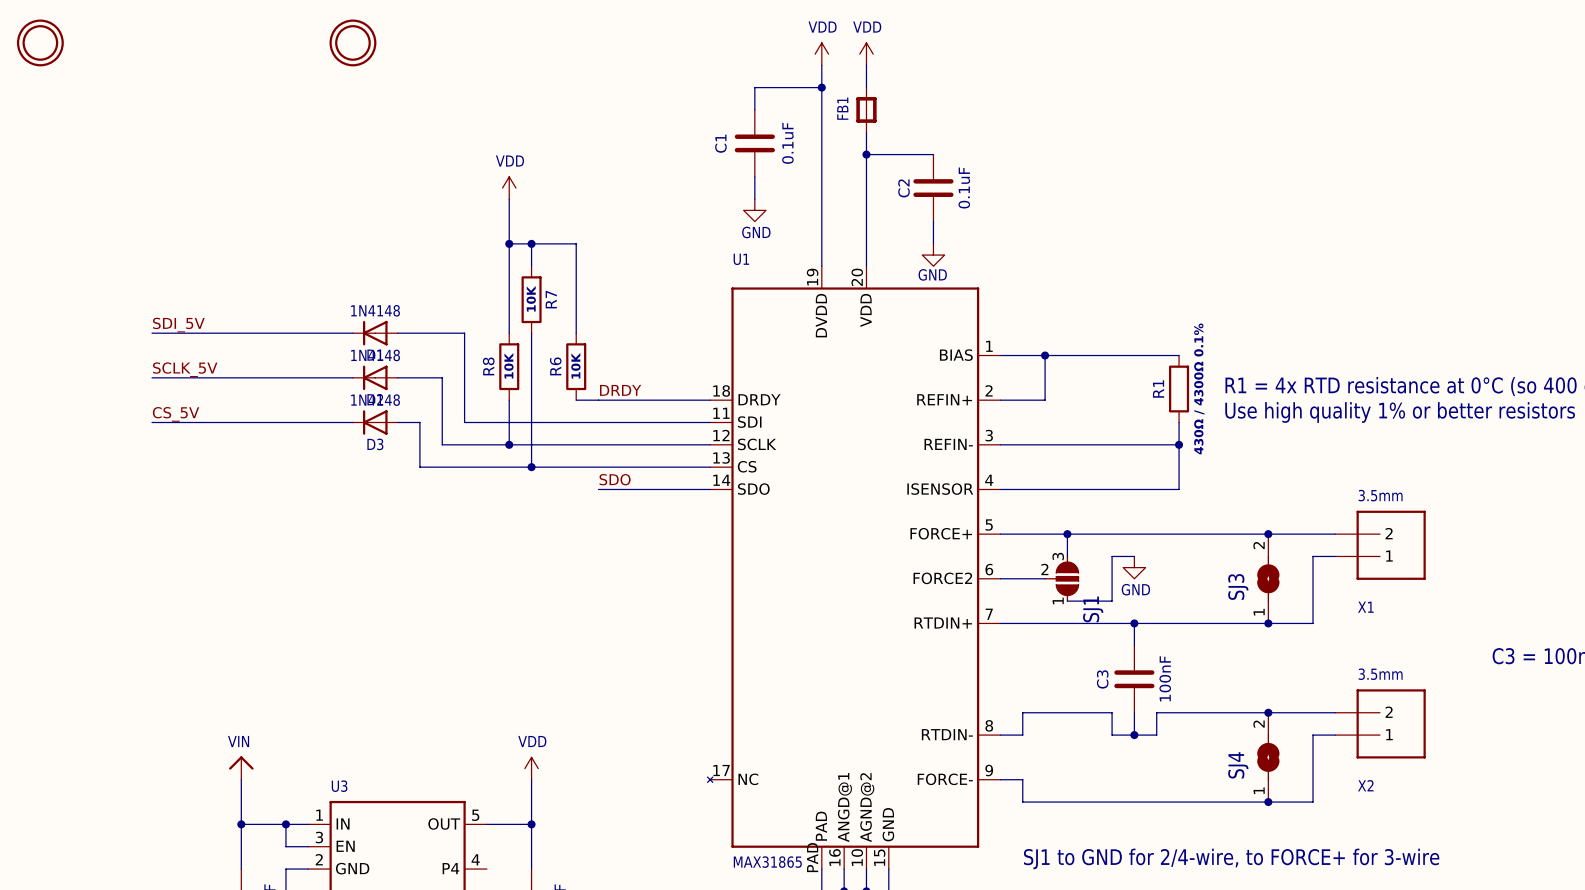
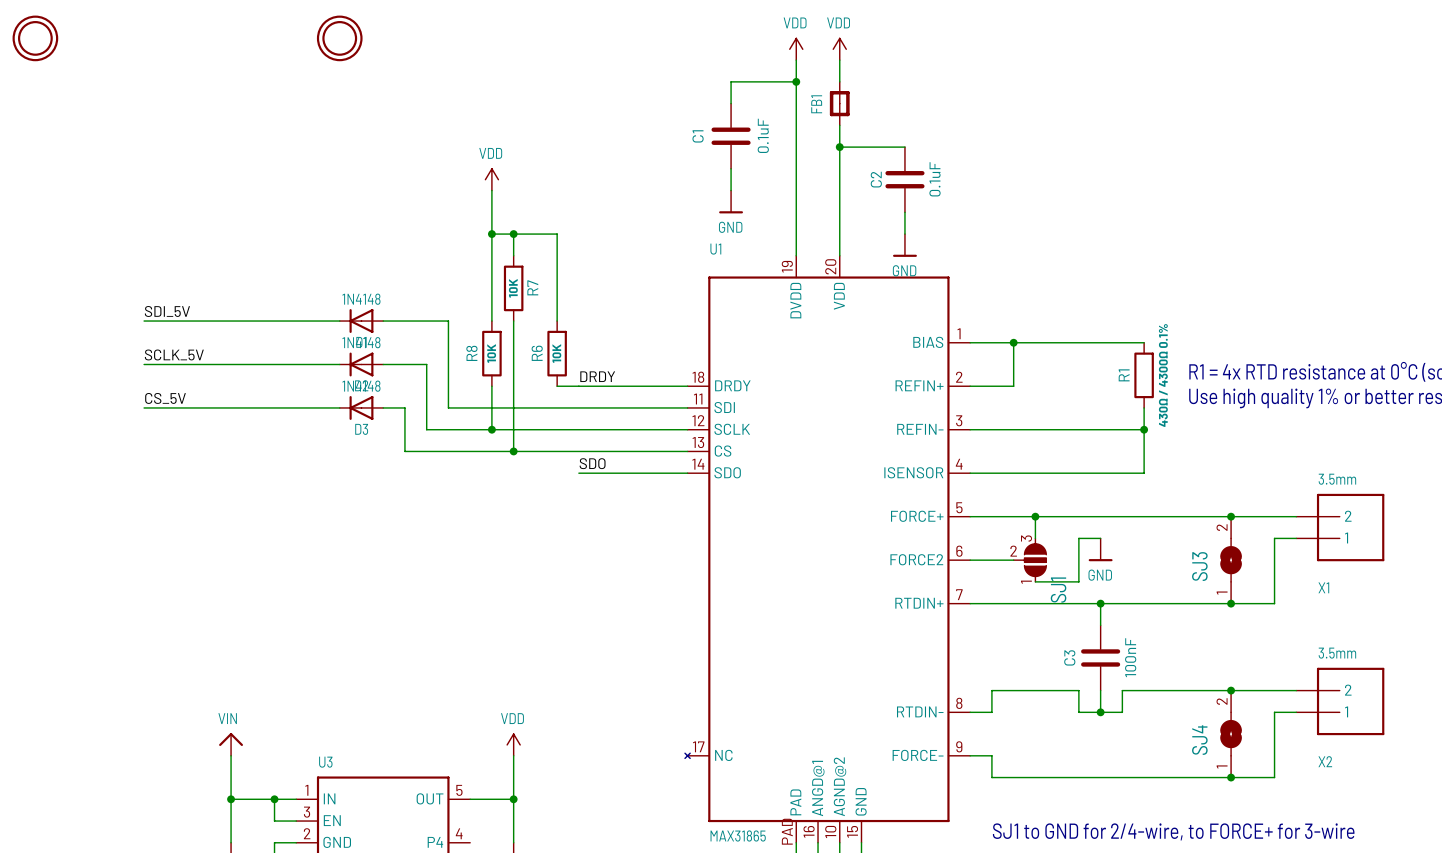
power symbol shape: [743, 199, 767, 222] -> [719, 190, 744, 214]
power symbol shape: [922, 243, 945, 267] -> [893, 234, 917, 257]
power symbol shape: [1123, 556, 1146, 579] -> [1088, 538, 1113, 562]

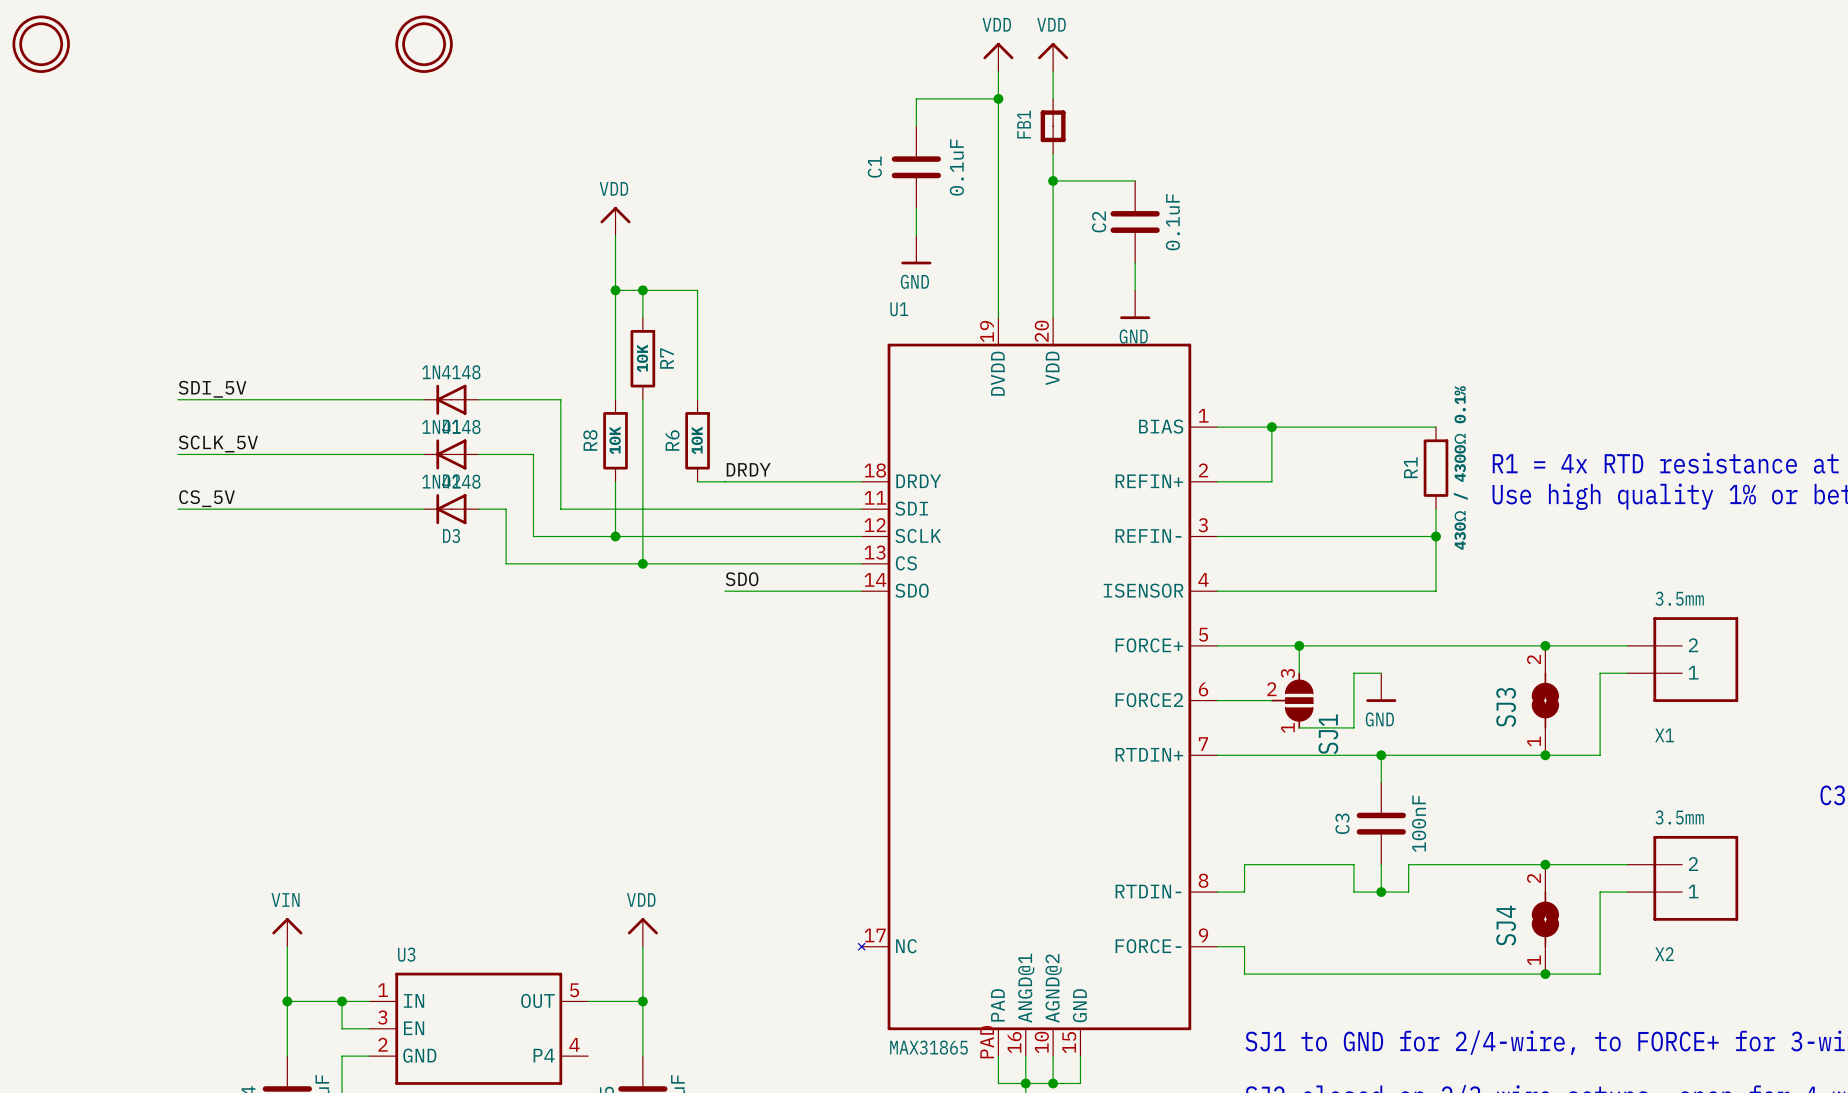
power symbol shape: [789, 38, 803, 61] -> [983, 42, 1014, 72]
power symbol shape: [833, 38, 847, 61] -> [1038, 42, 1069, 72]
power symbol shape: [485, 168, 499, 191] -> [600, 206, 631, 236]
power symbol shape: [507, 734, 521, 756] -> [627, 918, 658, 947]

